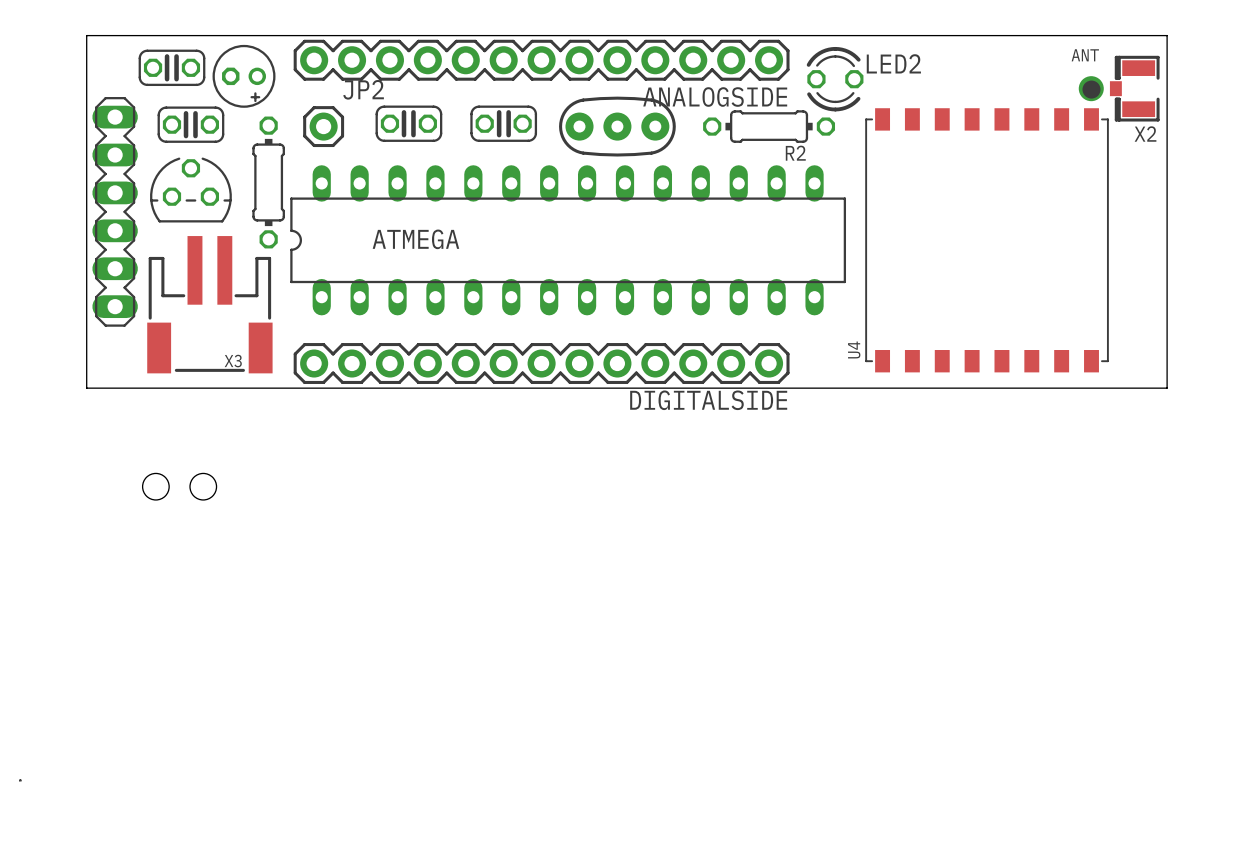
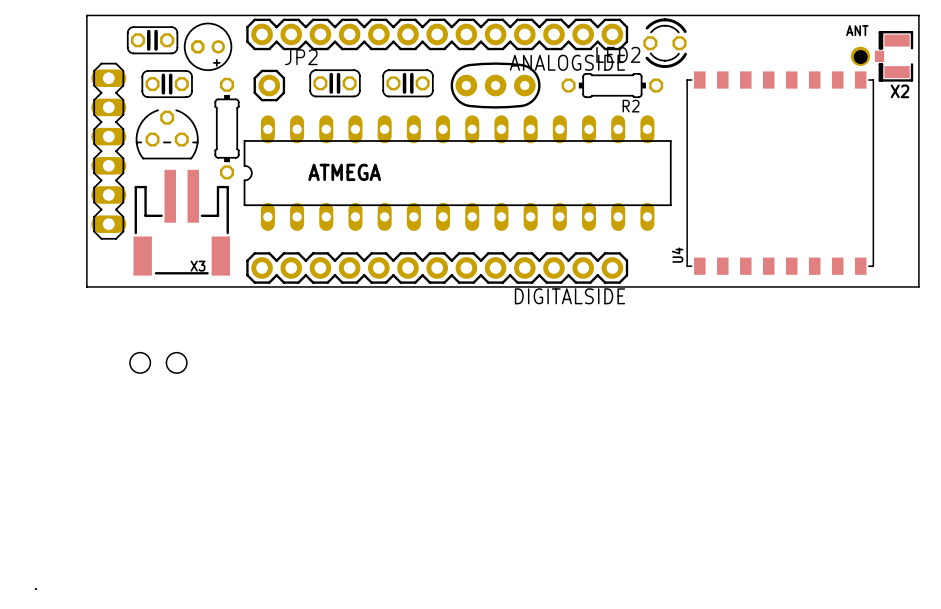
LED2 rotation: 0° (835, 79) -> 180° (665, 43)

